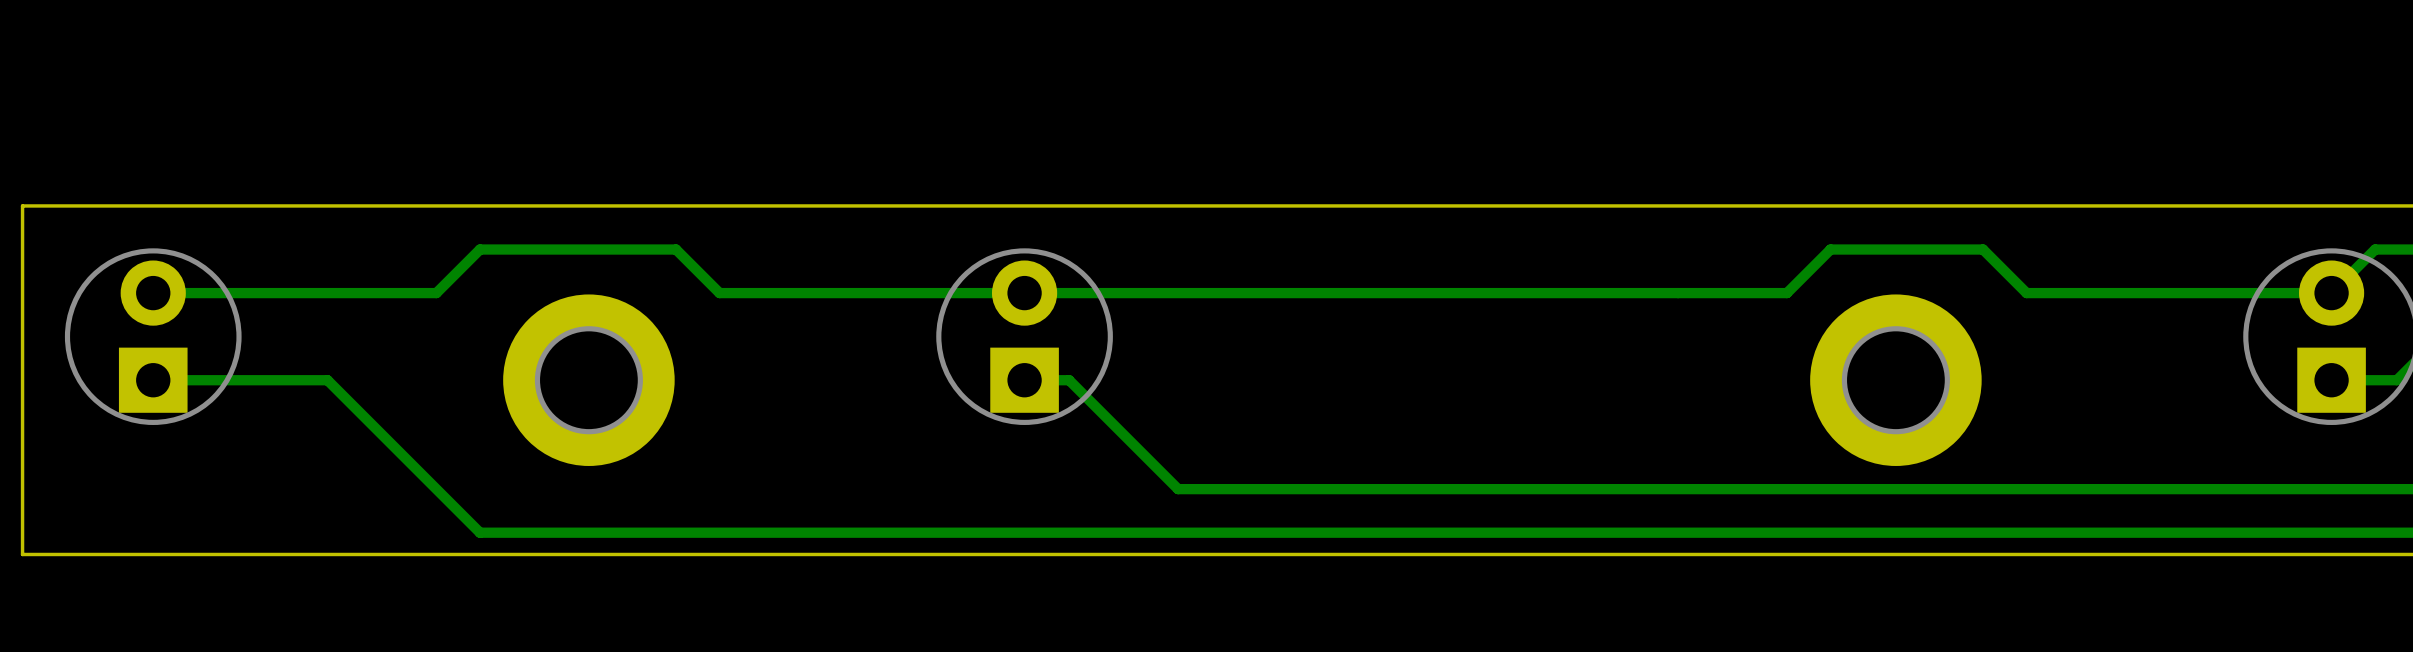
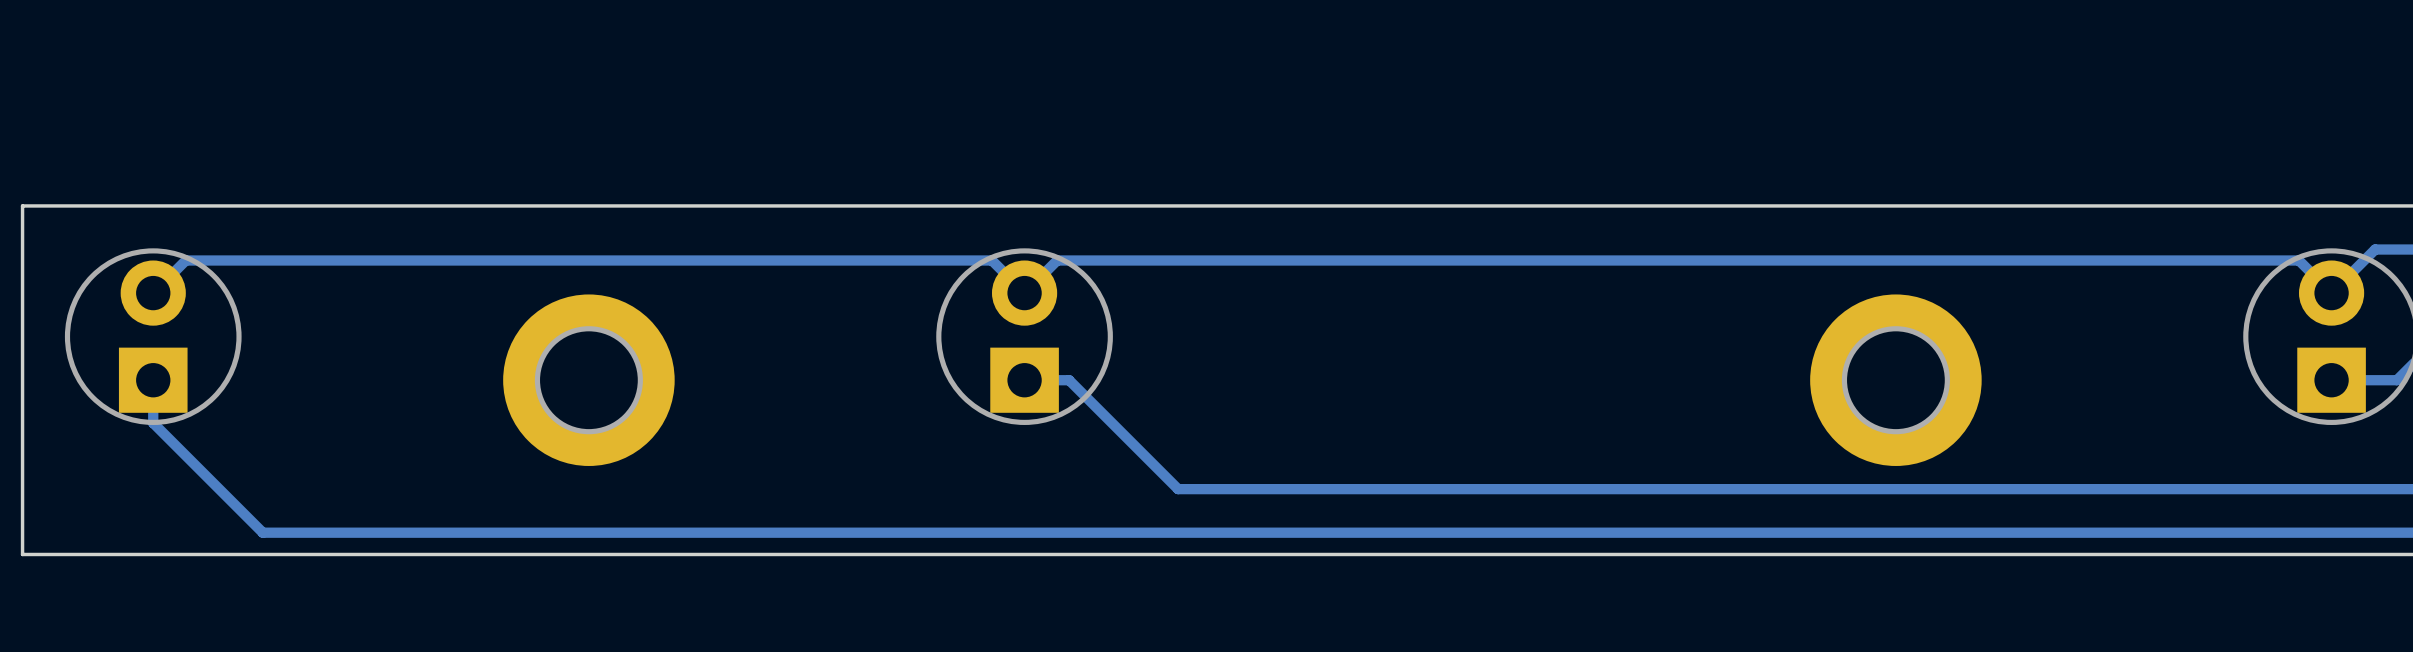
bottom track: (2331, 293) (2026, 293) (1983, 249) (1830, 249) (1786, 293) (719, 293) (676, 249) (479, 249) (436, 293) (153, 293) -> (2331, 293) (2298, 260) (1057, 260) (1024, 293) (991, 260) (185, 260) (153, 293)
bottom track: (153, 380) (327, 380) (479, 532) -> (153, 380) (153, 423) (262, 532) (479, 532)

